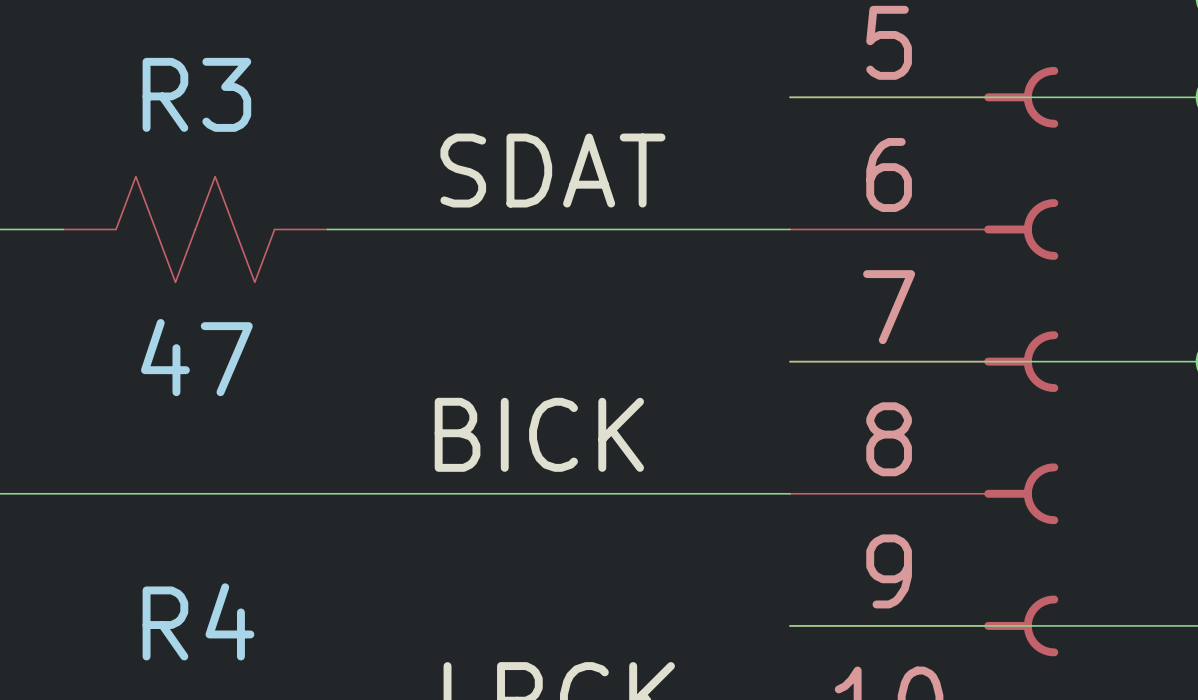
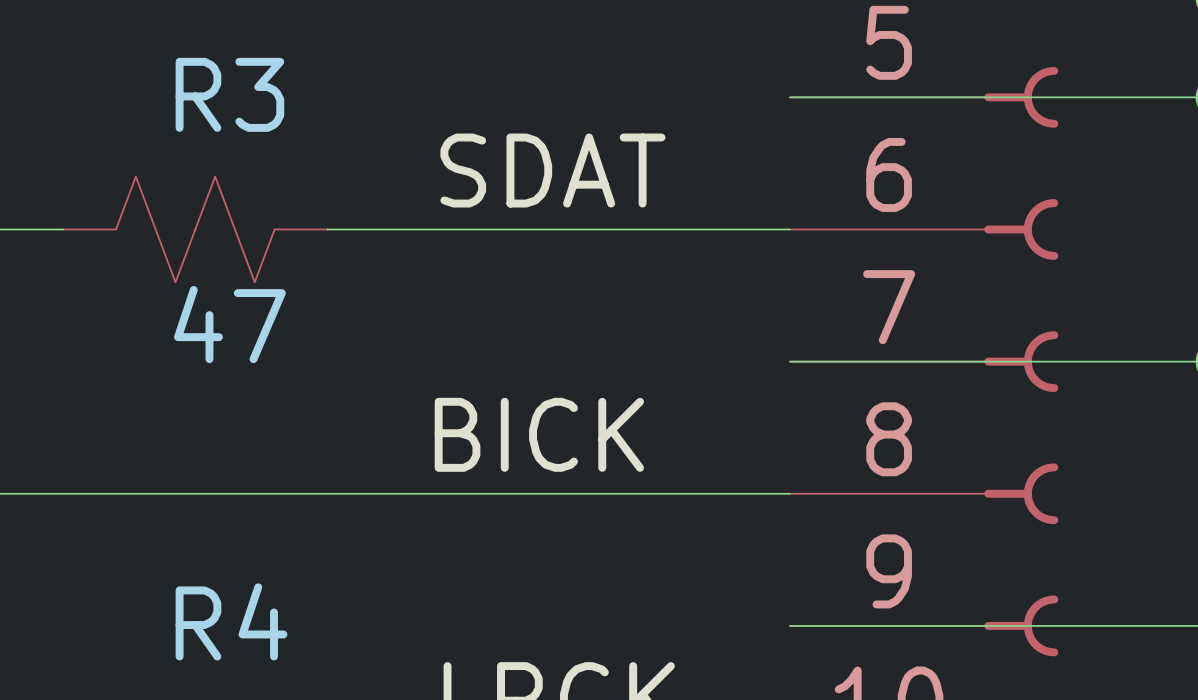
R3 name position: R3 (196, 94) -> R3 (229, 94)
R3 value position: 47 (196, 357) -> 47 (229, 324)
R4 name position: R4 (198, 621) -> R4 (231, 621)

